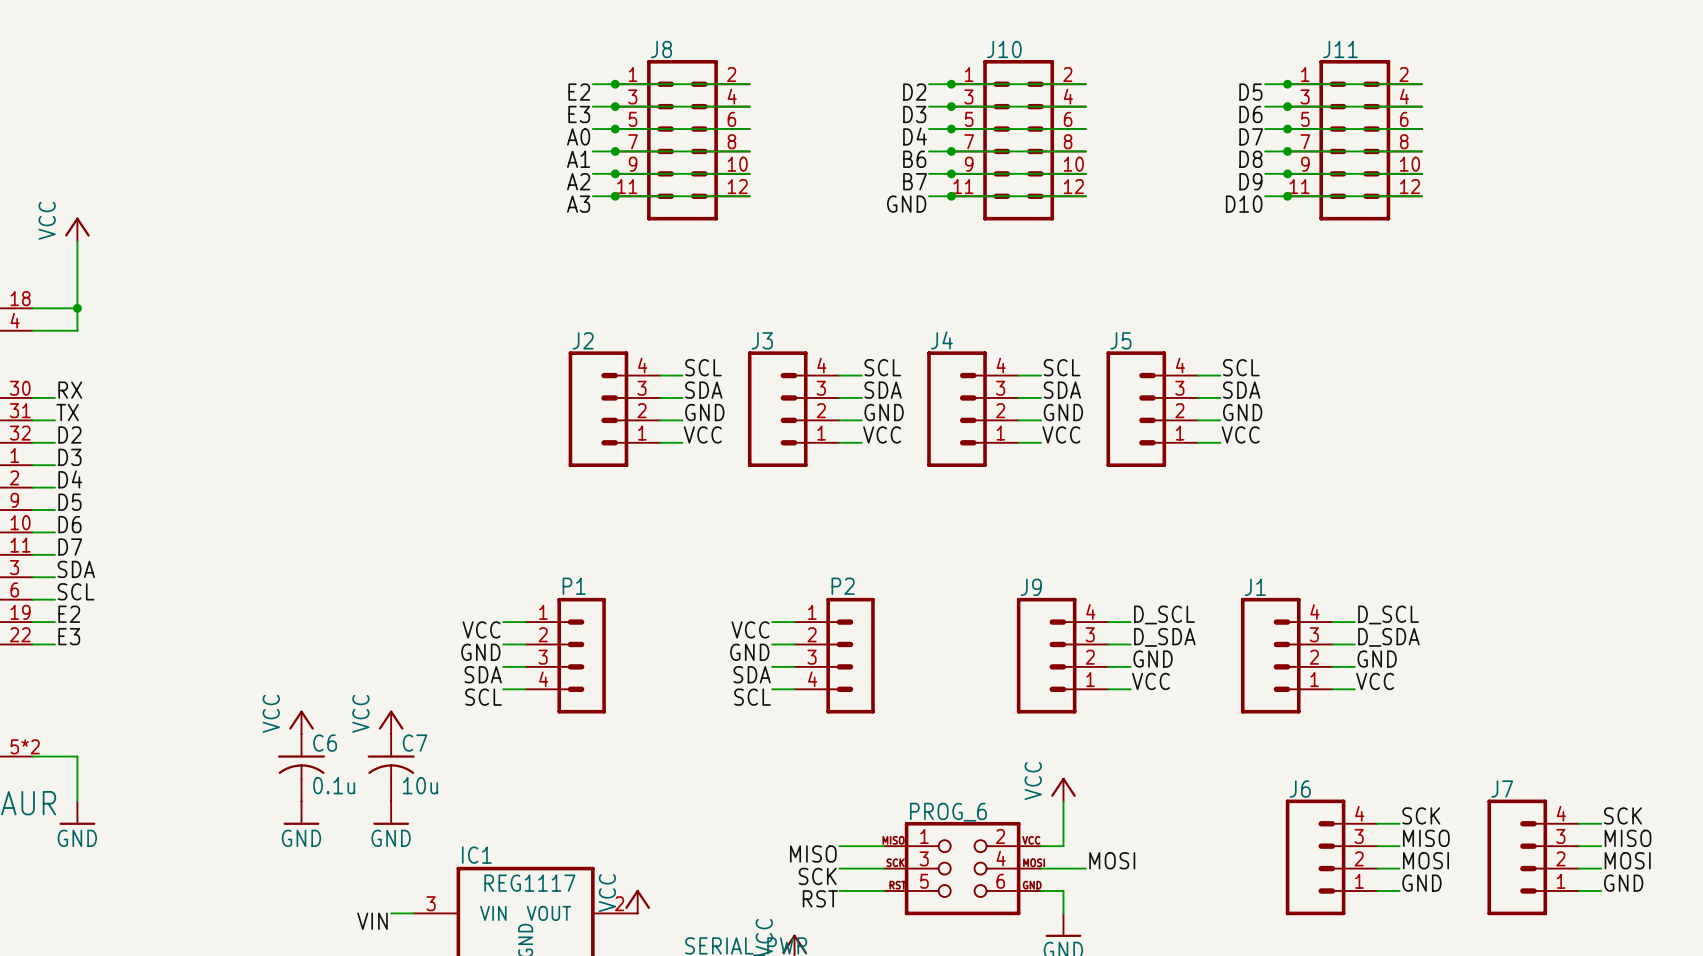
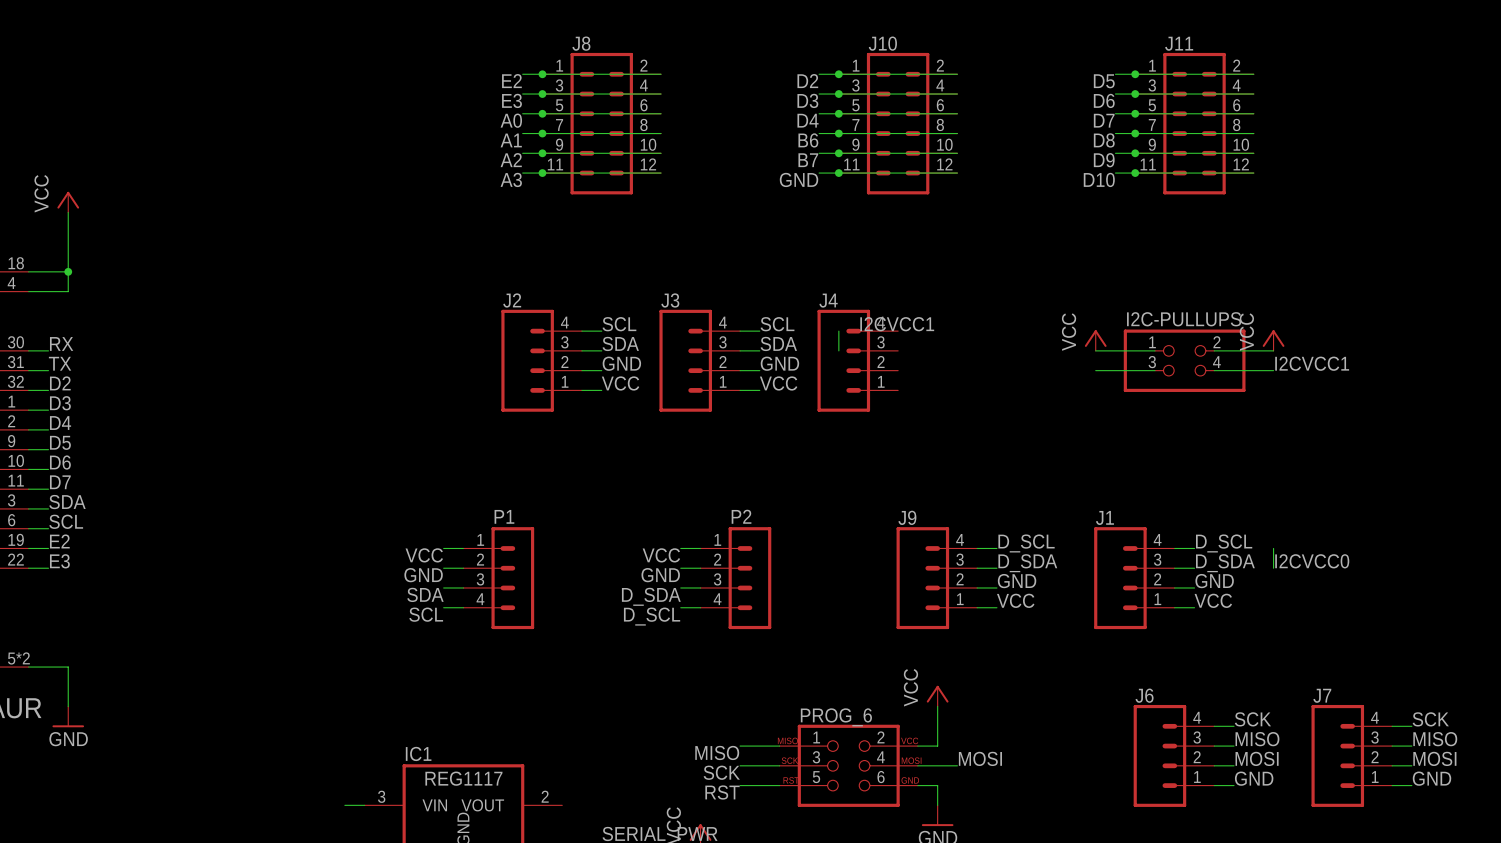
label: none -> I2CVCC1 (897, 324)
label: SCL (1062, 367) -> none
label: SCL (1241, 367) -> none
wire: none -> (838, 331) (838, 350)
wire: (1018, 375) (1041, 375) -> none
wire: (1197, 375) (1220, 375) -> none
power symbol: none -> VCC (1095, 340)
power symbol: none -> VCC (1273, 340)
label: SDA (1062, 390) -> none
label: SDA (1241, 390) -> none
wire: (1018, 397) (1041, 397) -> none
wire: (1197, 397) (1220, 397) -> none
wire: none -> (1095, 350) (1155, 350)
wire: none -> (1214, 350) (1273, 350)
J5: (1152, 409) -> none
I2C-PULLUPS: none -> (1184, 360)
label: GND (1063, 412) -> none
label: GND (1242, 412) -> none
label: none -> I2CVCC1 (1312, 363)
wire: (1018, 420) (1041, 420) -> none
wire: (1197, 420) (1220, 420) -> none
wire: none -> (1095, 370) (1155, 370)
wire: none -> (1214, 370) (1273, 370)
label: VCC (1061, 434) -> none
label: VCC (1240, 434) -> none
wire: (1018, 442) (1041, 442) -> none
wire: (1197, 442) (1220, 442) -> none
wire: none -> (1273, 548) (1273, 568)
label: none -> I2CVCC0 (1312, 561)
label: SDA (752, 674) -> D_SDA (651, 596)
label: SCL (752, 697) -> D_SCL (652, 616)
power symbol: VCC (301, 722) -> none
power symbol: VCC (391, 722) -> none
C6: 0.1u (301, 767) -> none
C7: 10u (391, 767) -> none
power symbol: GND (301, 813) -> none
power symbol: GND (391, 813) -> none
power symbol: VCC (637, 901) -> none
label: VIN (372, 921) -> none

